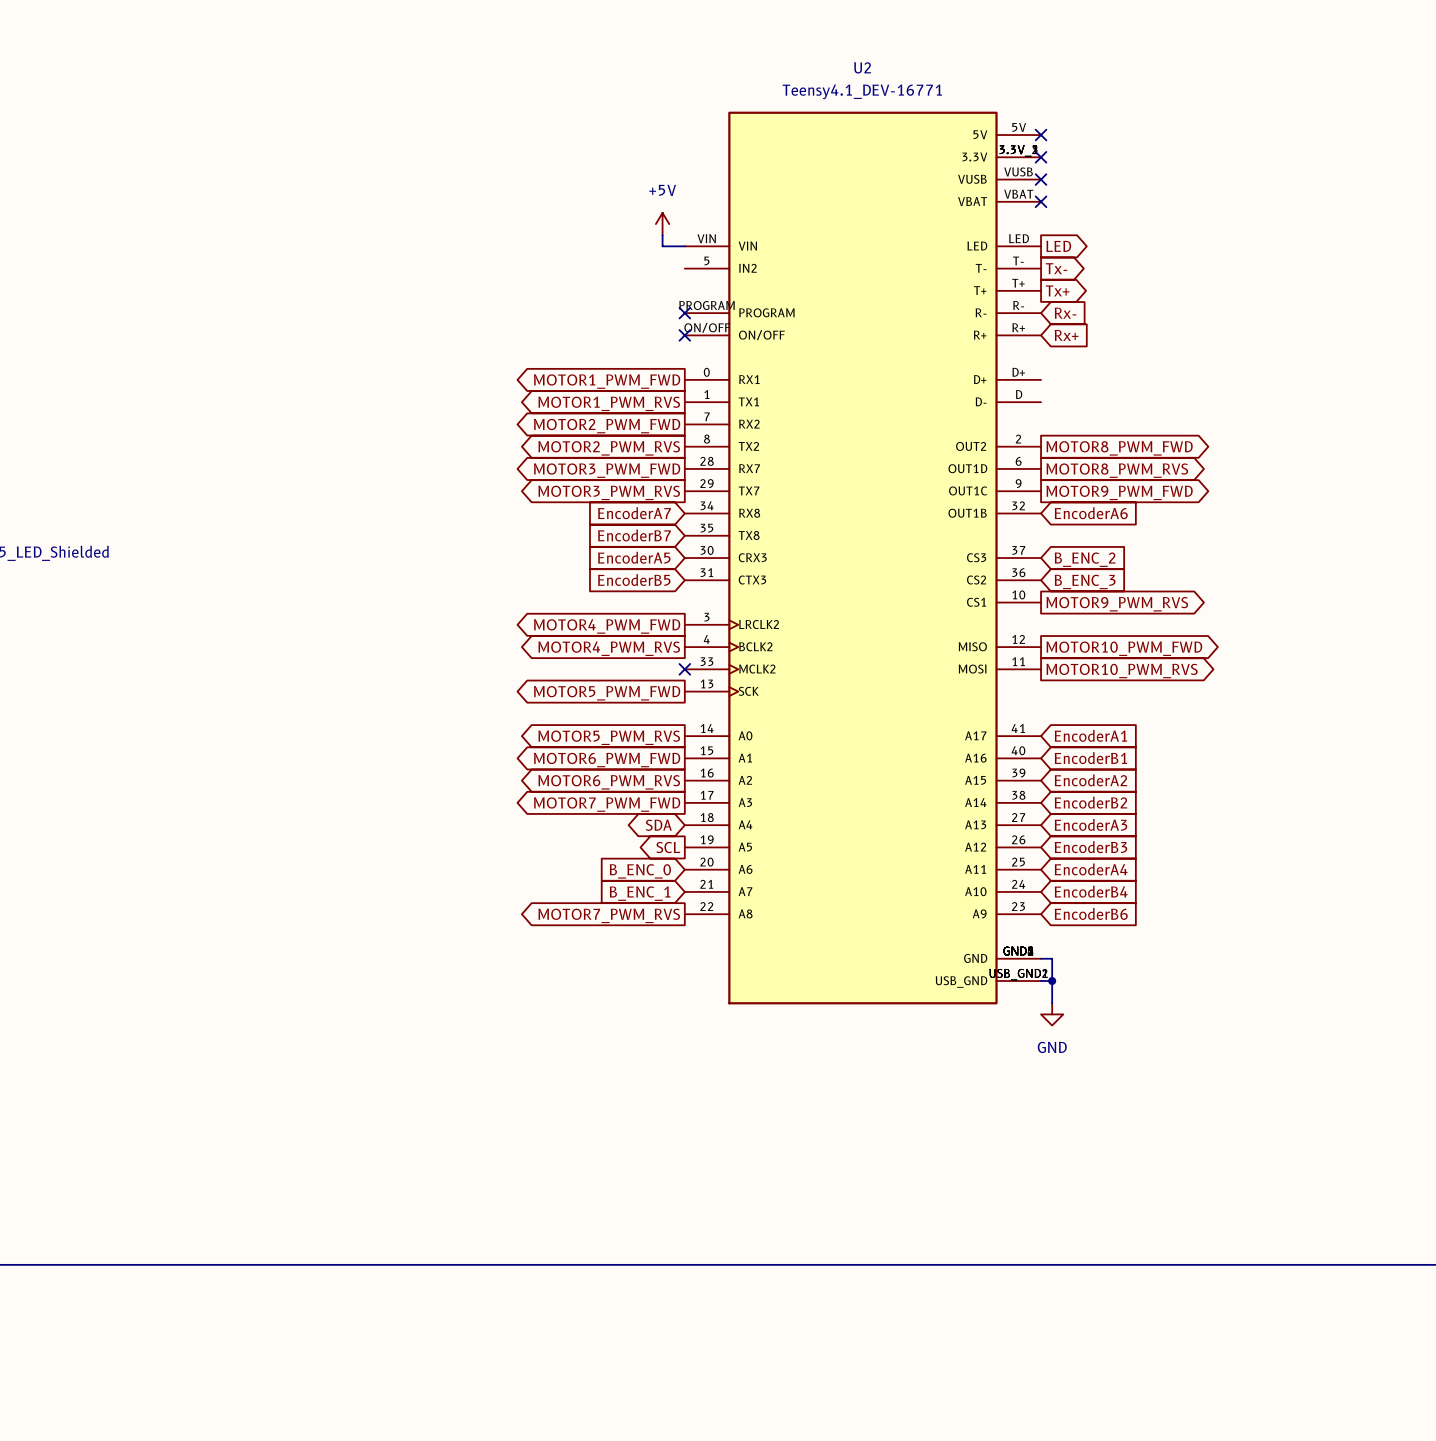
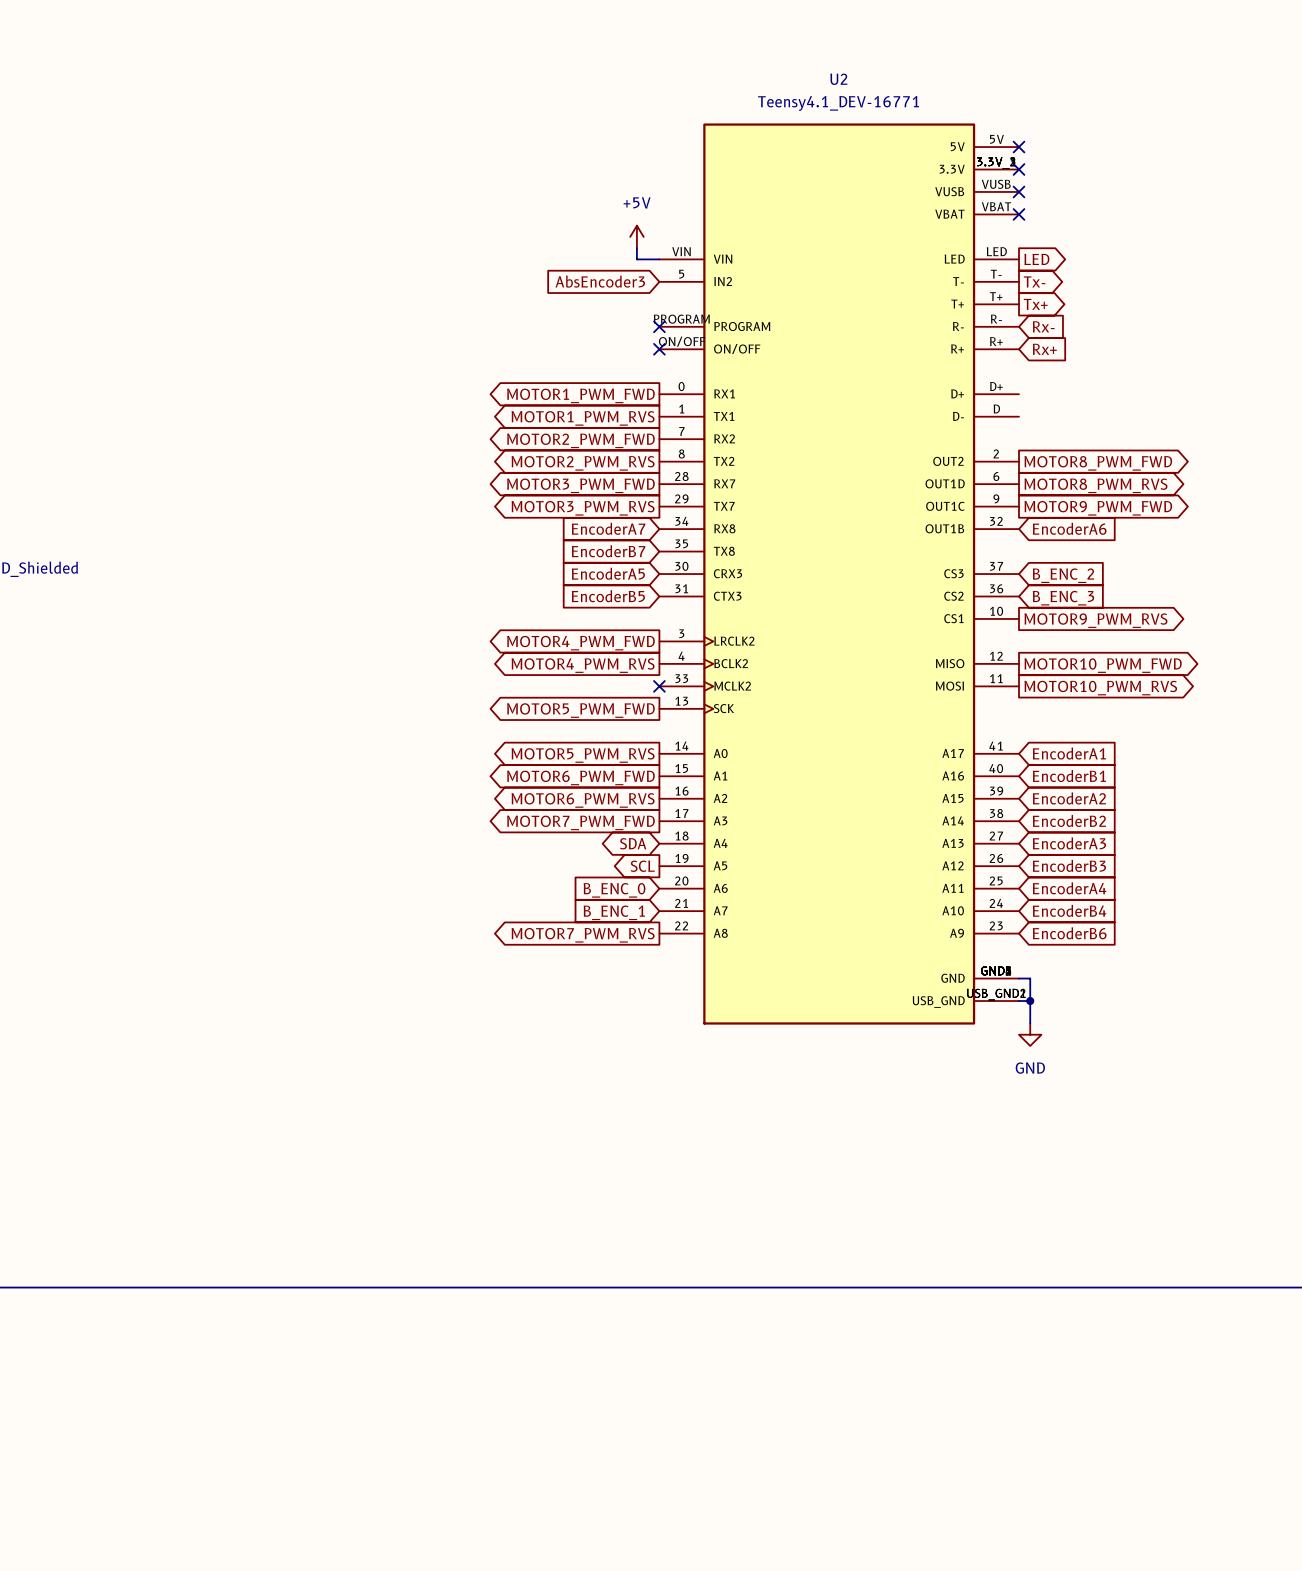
global label: none -> AbsEncoder3 (600, 281)

